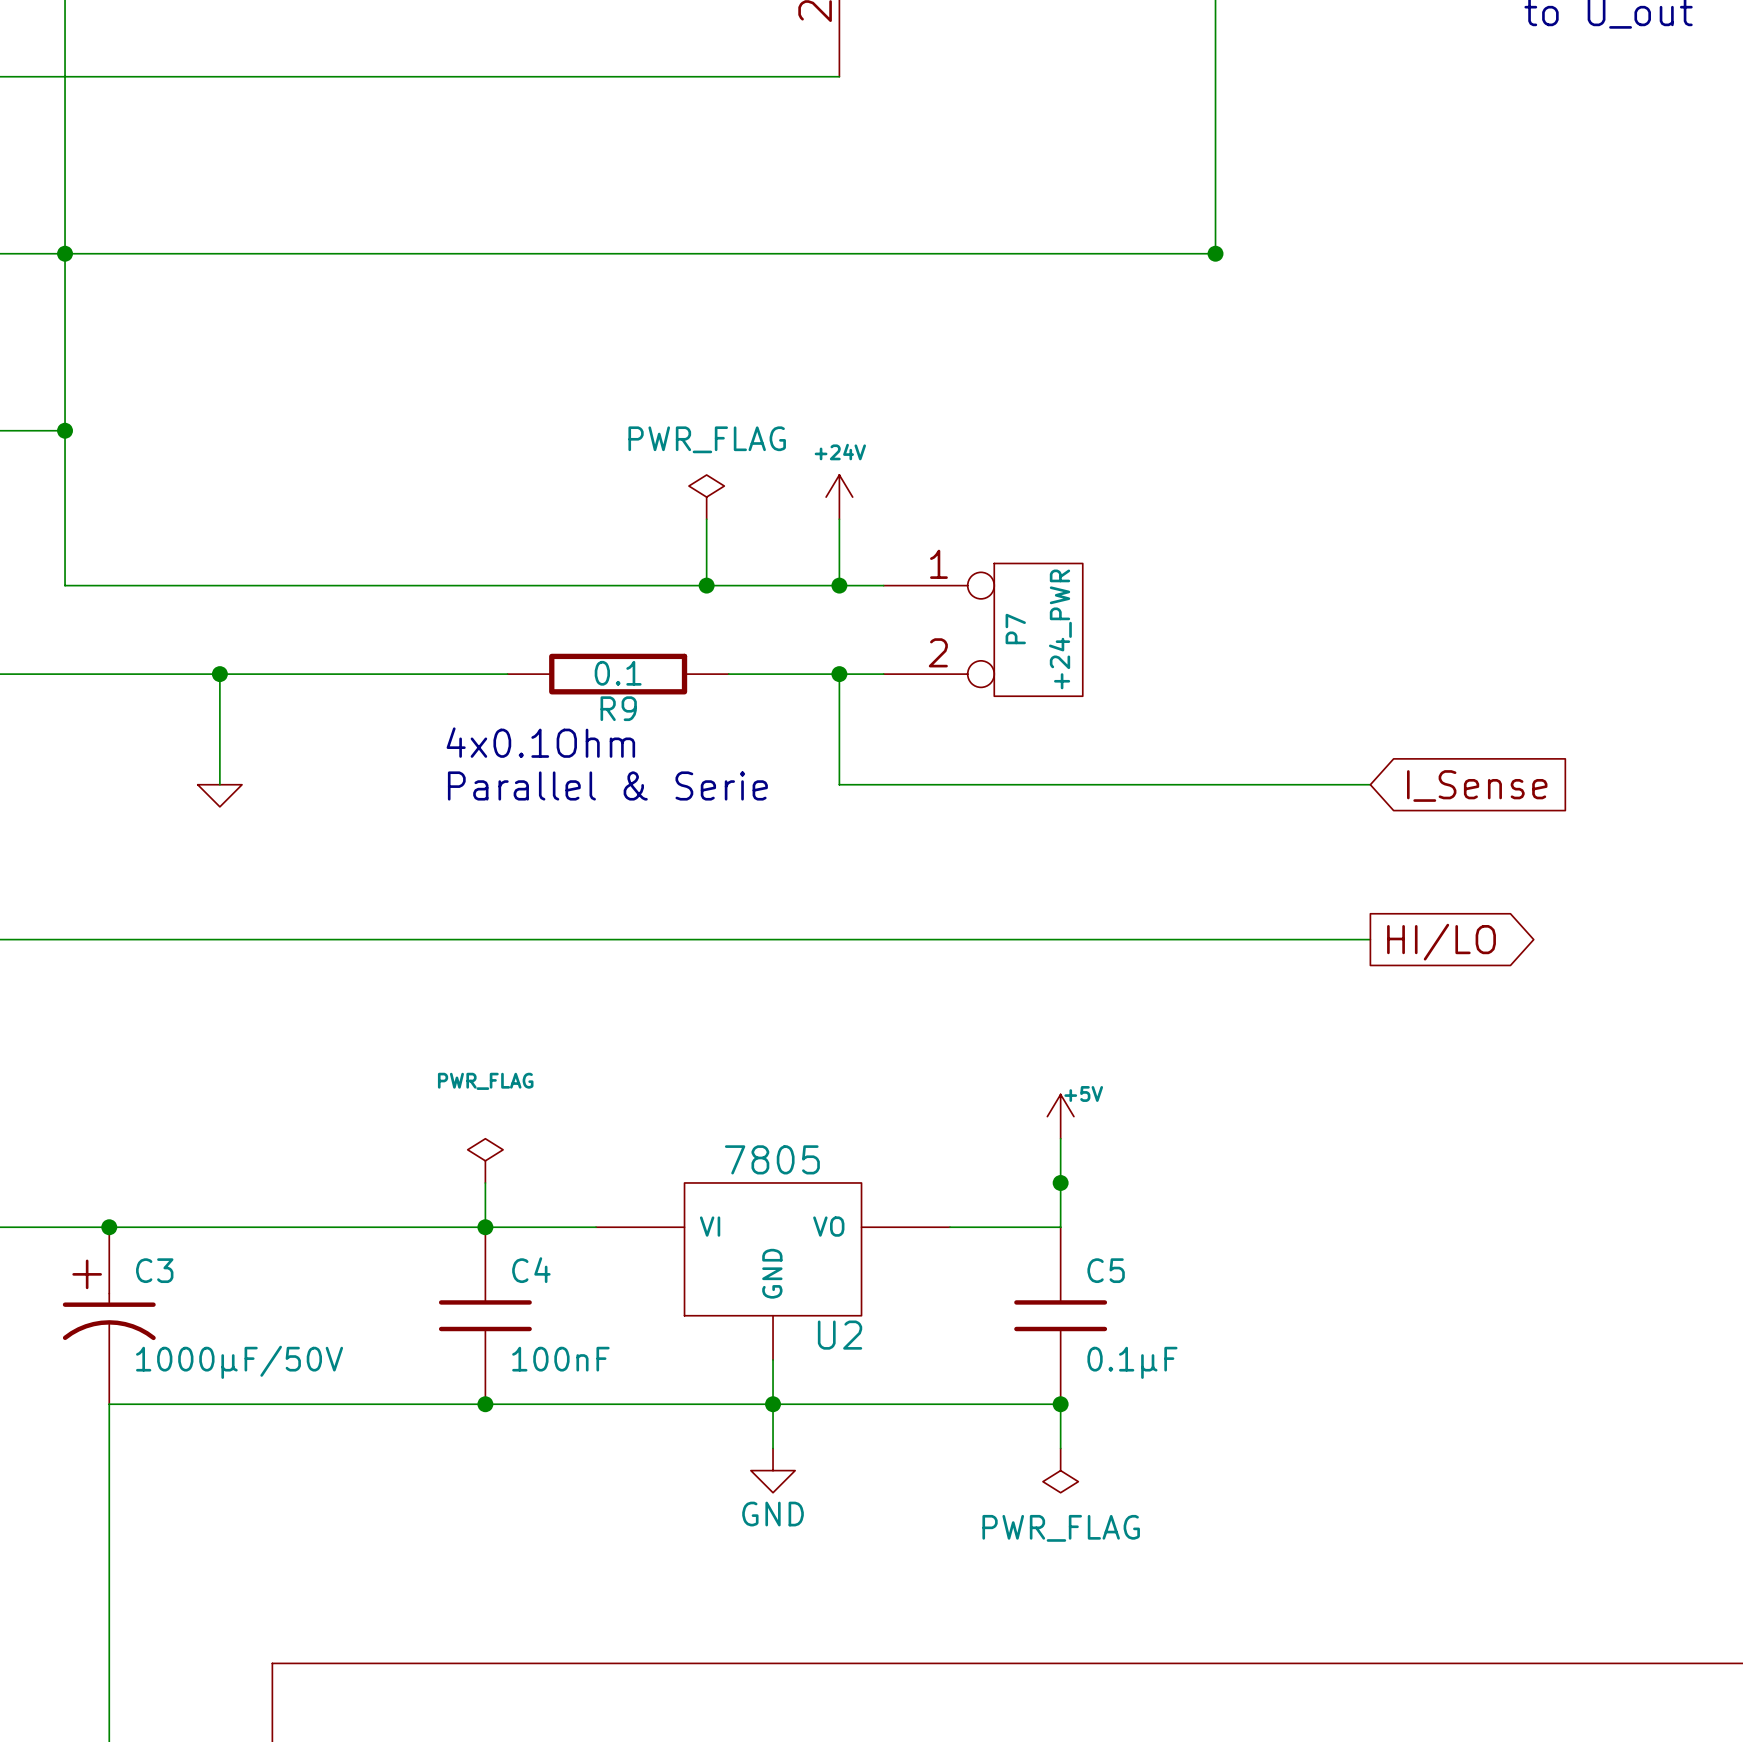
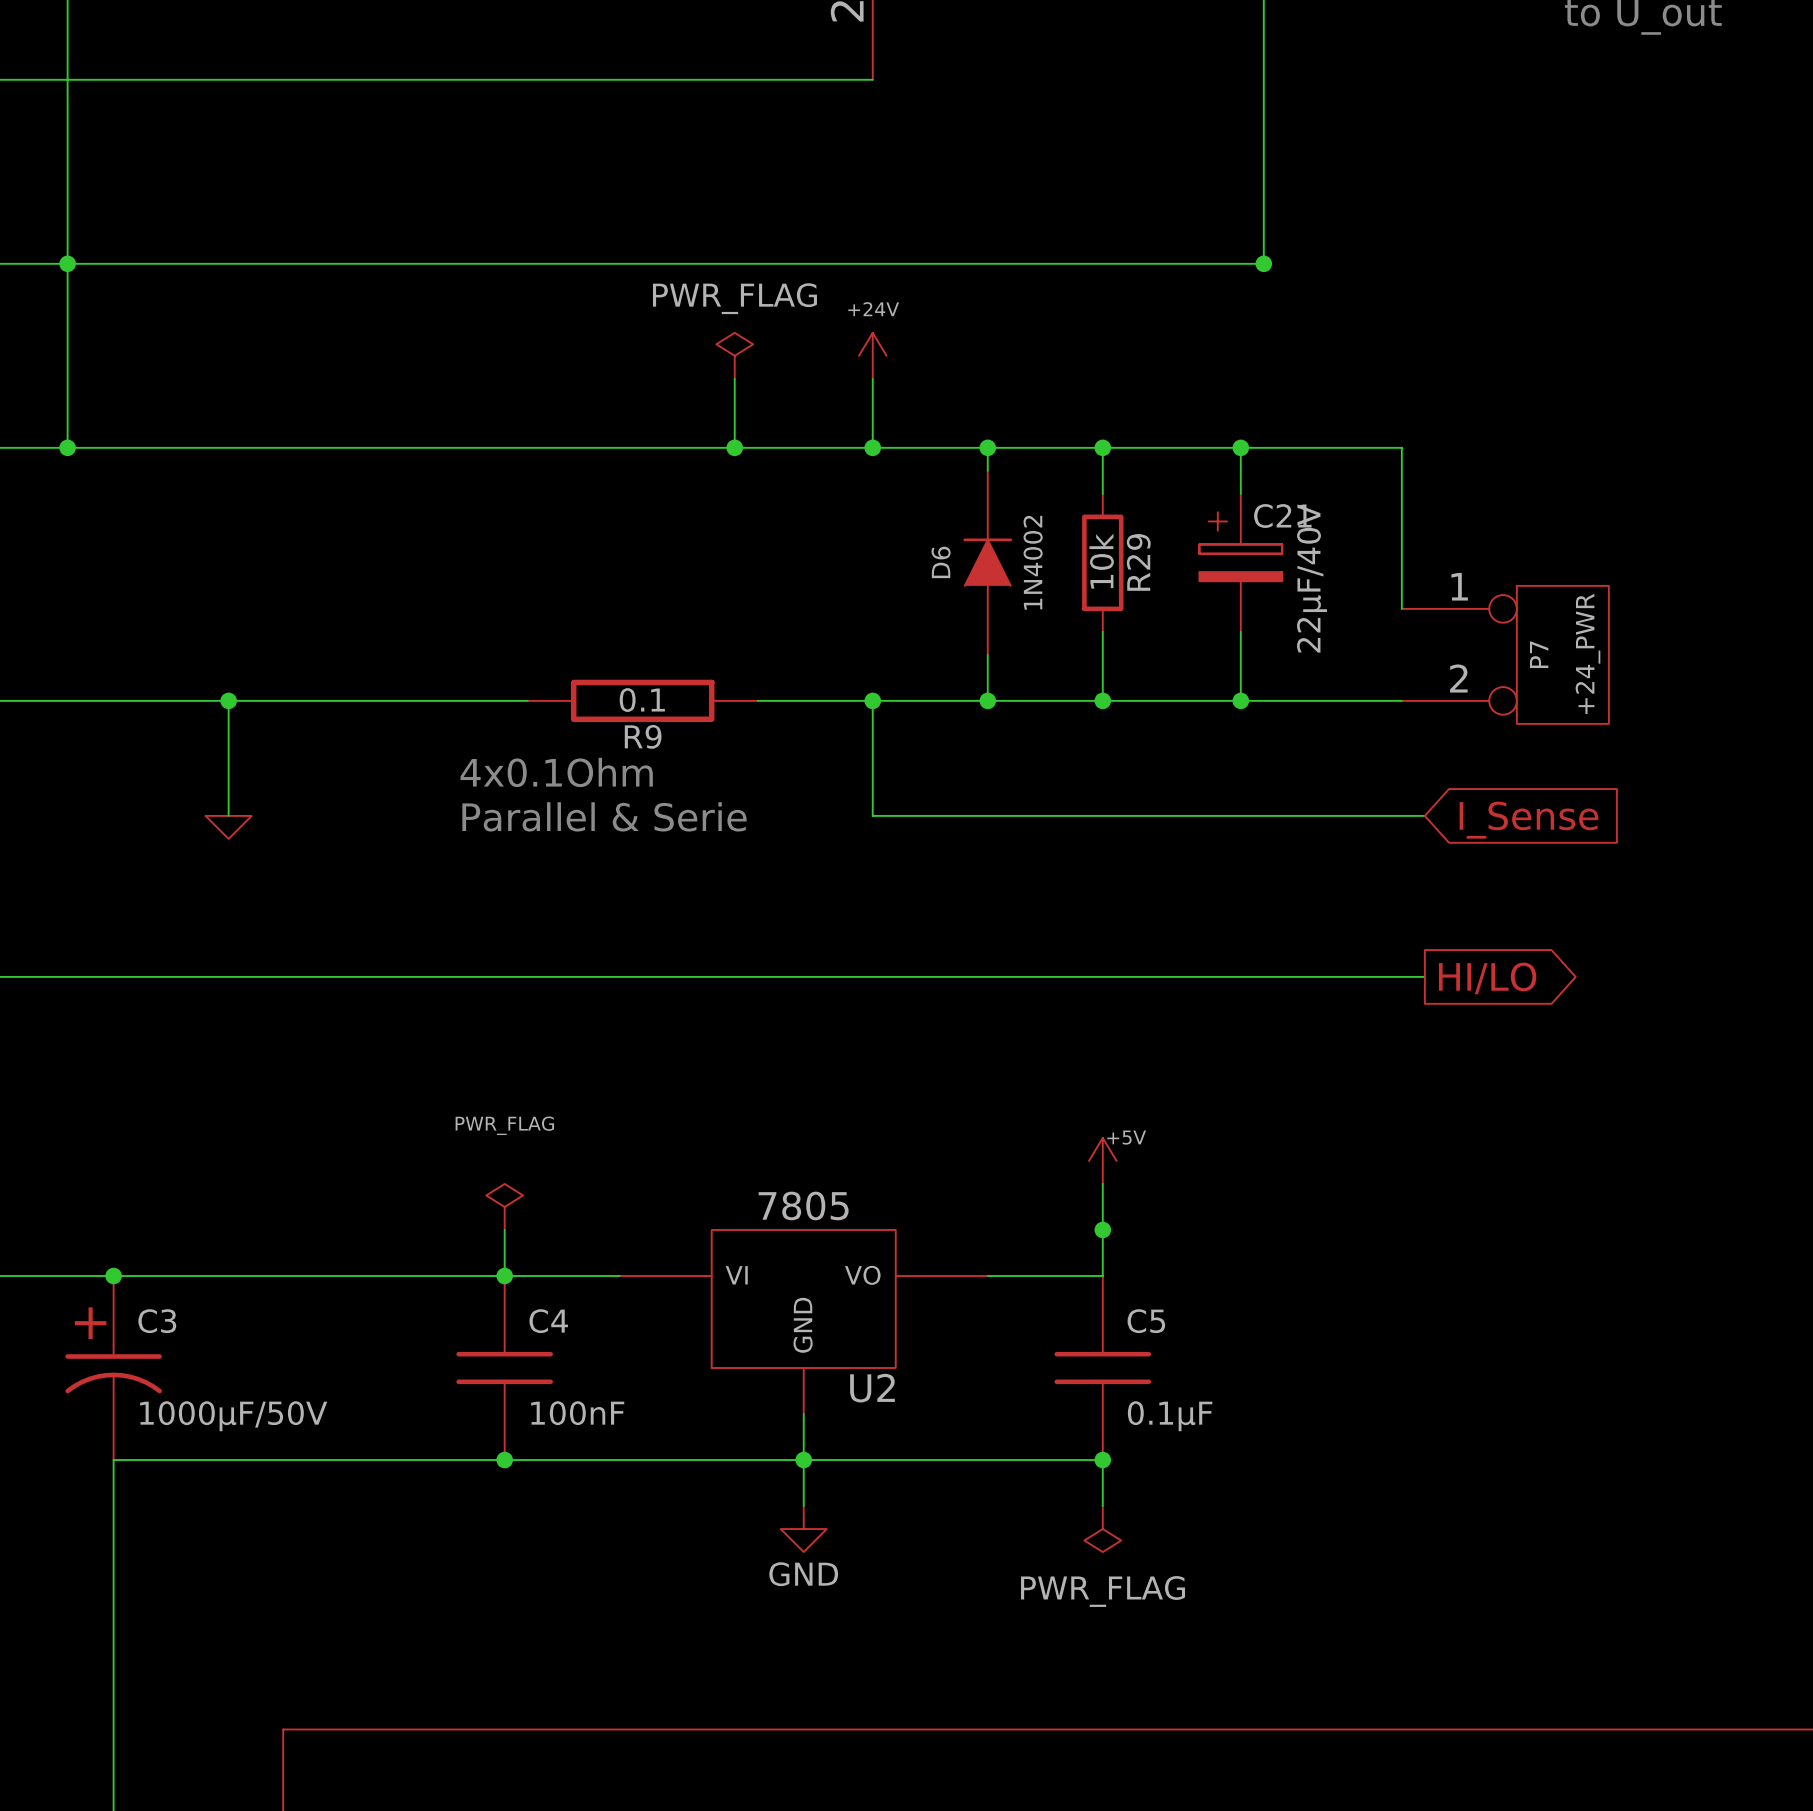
wire: (65, 430) (65, 585) (883, 585) -> (67, 447) (1401, 447) (1401, 608)
junction: none -> (734, 447)
junction: none -> (872, 447)
wire: none -> (987, 447) (987, 470)
junction: none -> (987, 447)
wire: none -> (1102, 447) (1102, 493)
junction: none -> (1102, 447)
wire: none -> (1240, 447) (1240, 493)
junction: none -> (1240, 447)
power symbol position: PWR_FLAG (706, 497) -> PWR_FLAG (734, 355)
power symbol position: +24V (839, 497) -> +24V (872, 355)
wire: (706, 519) (706, 585) -> (734, 378) (734, 447)
wire: (839, 519) (839, 585) -> (872, 378) (872, 447)
D6: none -> 1N4002 (987, 562)
R29: none -> 10k (1102, 562)
C21: none -> 22µF/40V (1240, 562)
junction: (706, 585) -> none
junction: (839, 585) -> none
wire: none -> (1102, 631) (1102, 700)
wire: none -> (1240, 631) (1240, 700)
wire: none -> (987, 654) (987, 700)
P7 position: (983, 629) -> (1505, 654)
wire: none -> (918, 700) (1401, 700)
junction: none -> (987, 700)
junction: none -> (1102, 700)
junction: none -> (1240, 700)

